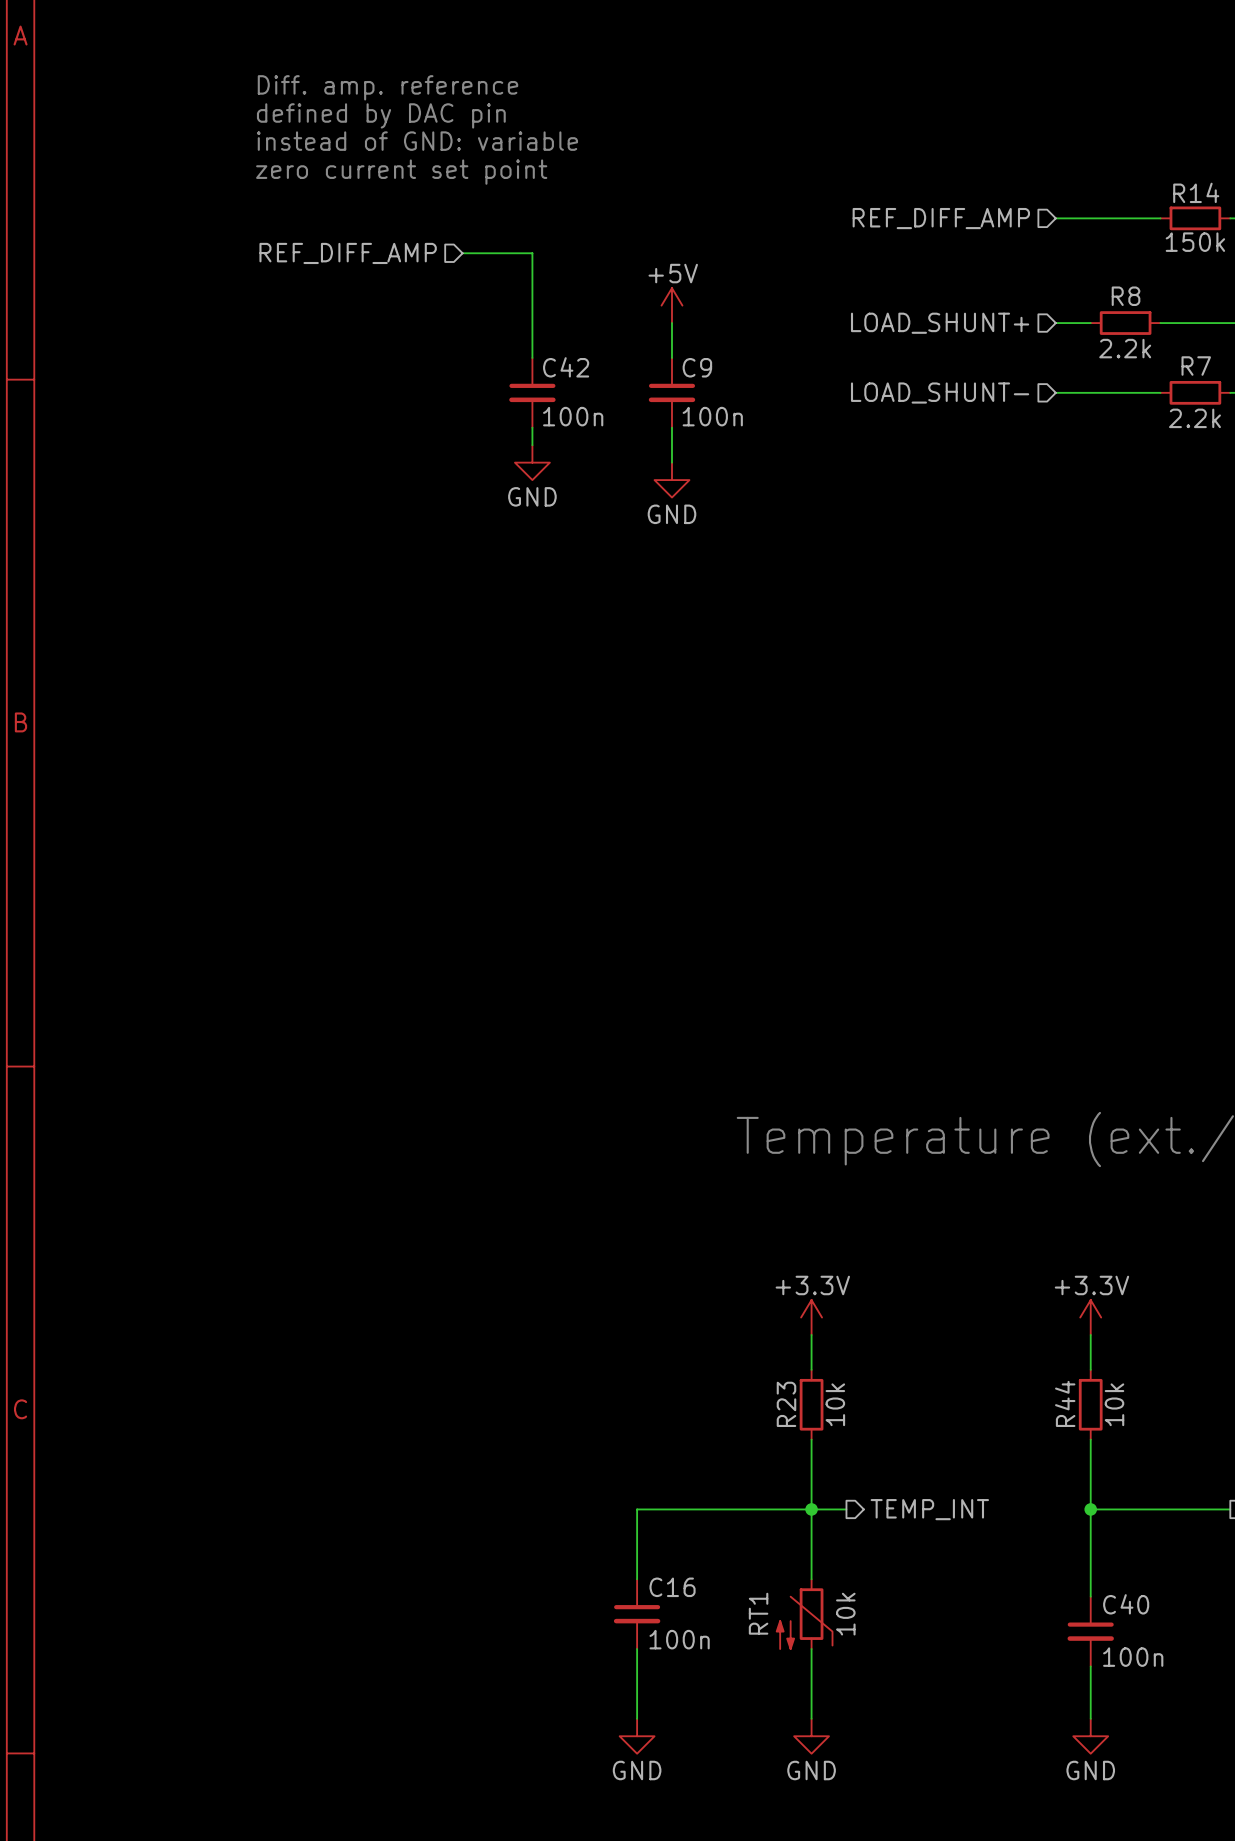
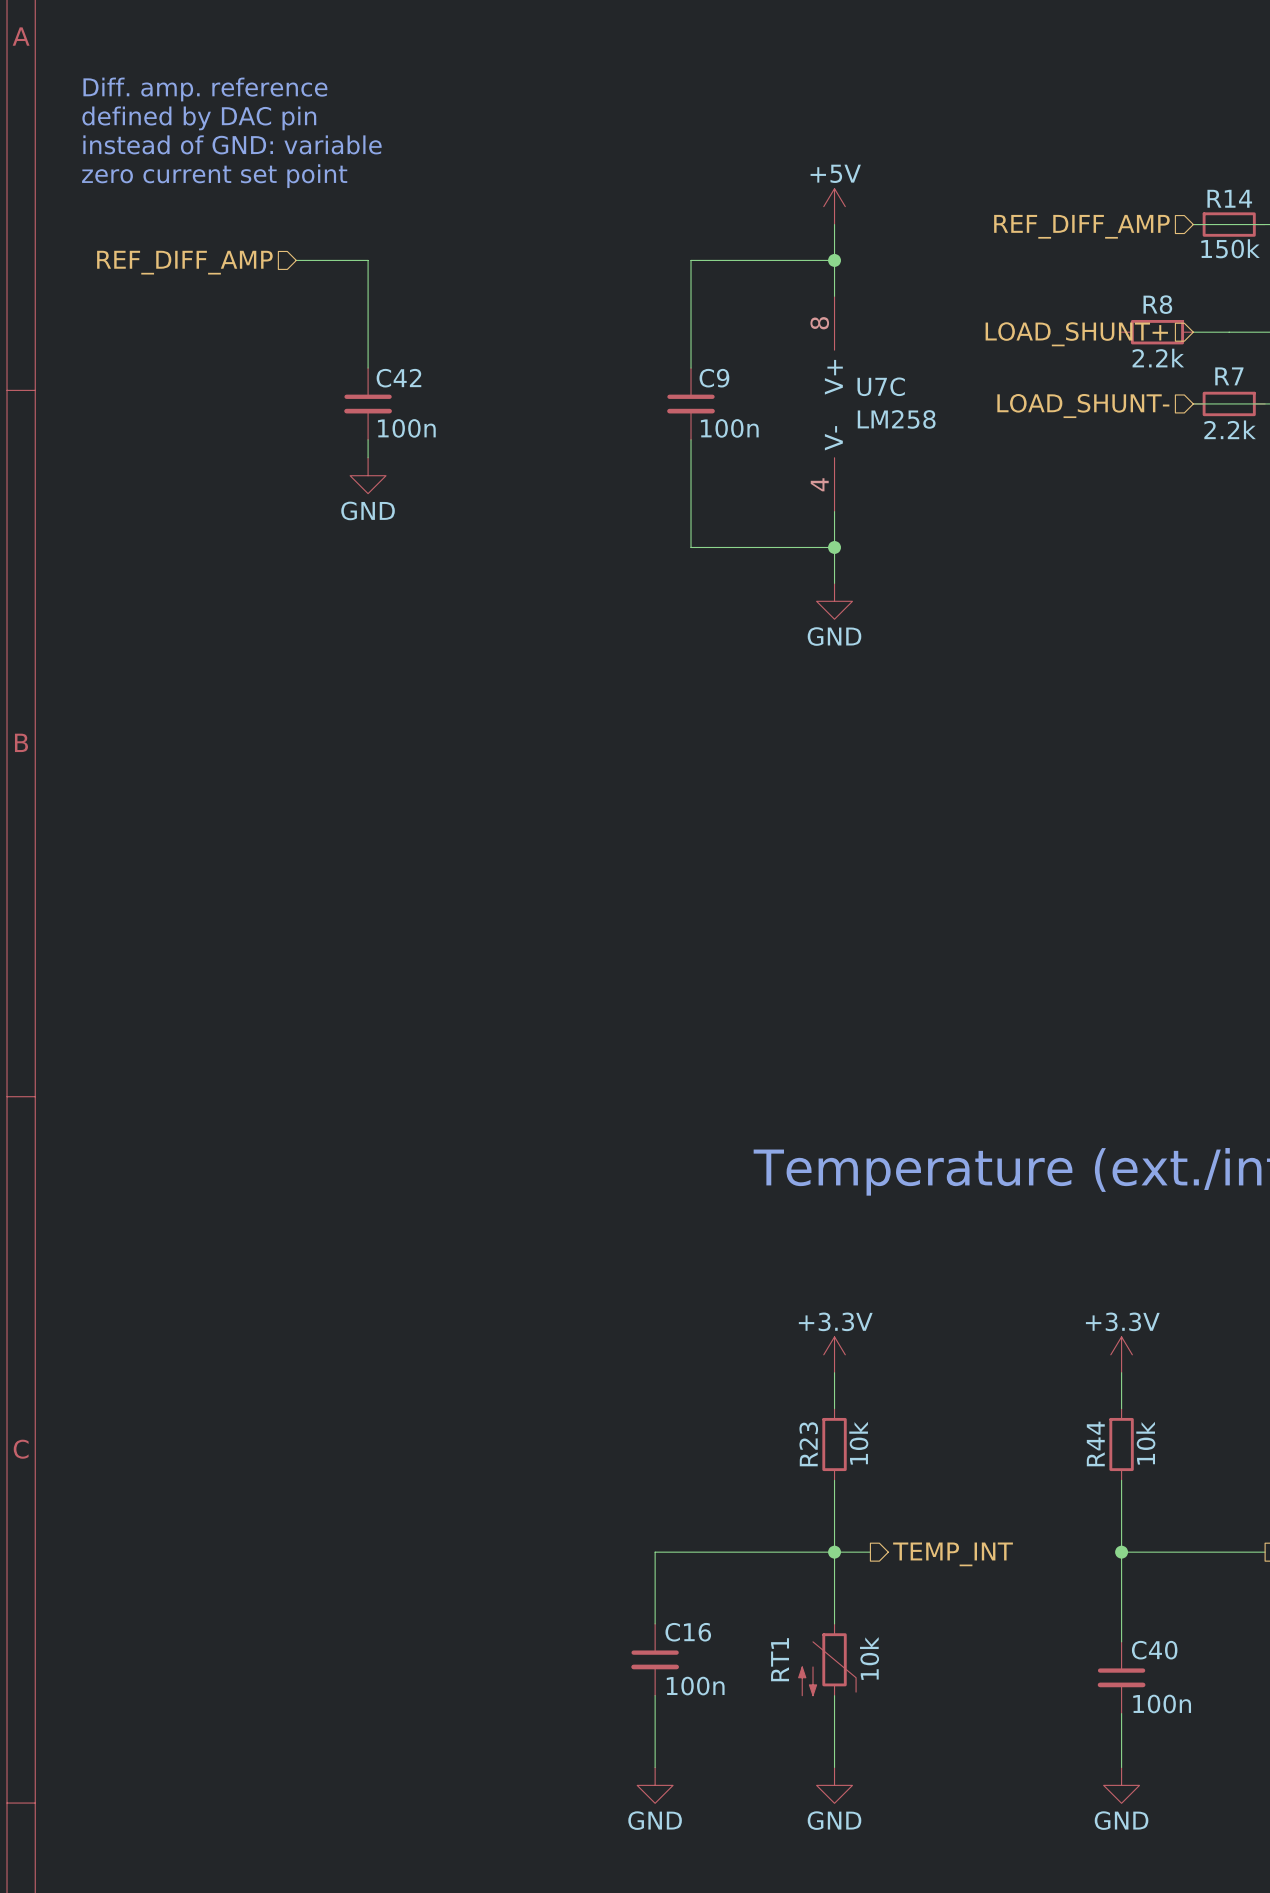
text position: Diff. amp. reference (387, 87) -> Diff. amp. reference (205, 89)
text position: defined by DAC pin (381, 115) -> defined by DAC pin (199, 118)
text position: instead of GND: variable (417, 141) -> instead of GND: variable (232, 144)
text position: zero current set point (401, 172) -> zero current set point (214, 176)
wire: none -> (834, 224) (834, 296)
hierarchical label position: REF_DIFF_AMP (941, 218) -> REF_DIFF_AMP (1081, 226)
wire: (1055, 218) (1160, 218) -> (1265, 224) (1193, 224)
hierarchical label position: REF_DIFF_AMP (348, 253) -> REF_DIFF_AMP (184, 262)
wire: (462, 253) (532, 253) (532, 357) -> (296, 260) (368, 260) (368, 368)
wire: none -> (834, 260) (691, 260) (691, 332)
junction: none -> (834, 260)
power symbol position: +5V (671, 305) -> +5V (834, 206)
hierarchical label position: LOAD_SHUNT+ (940, 323) -> LOAD_SHUNT+ (1076, 334)
wire: (1055, 323) (1090, 323) -> none
C42 symbol: [509, 357, 556, 428] -> [344, 368, 392, 440]
U7C: none -> LM258 (834, 403)
wire: (1055, 392) (1160, 392) -> (1265, 403) (1193, 403)
hierarchical label position: LOAD_SHUNT- (940, 393) -> LOAD_SHUNT- (1083, 406)
wire: (532, 427) (532, 445) -> (368, 439) (368, 457)
power symbol: none -> GND (368, 475)
power symbol: GND (532, 462) -> none
wire: none -> (691, 475) (691, 547) (834, 547)
power symbol: GND (671, 480) -> none
wire: none -> (834, 511) (834, 583)
junction: none -> (834, 547)
power symbol: none -> GND (834, 601)

